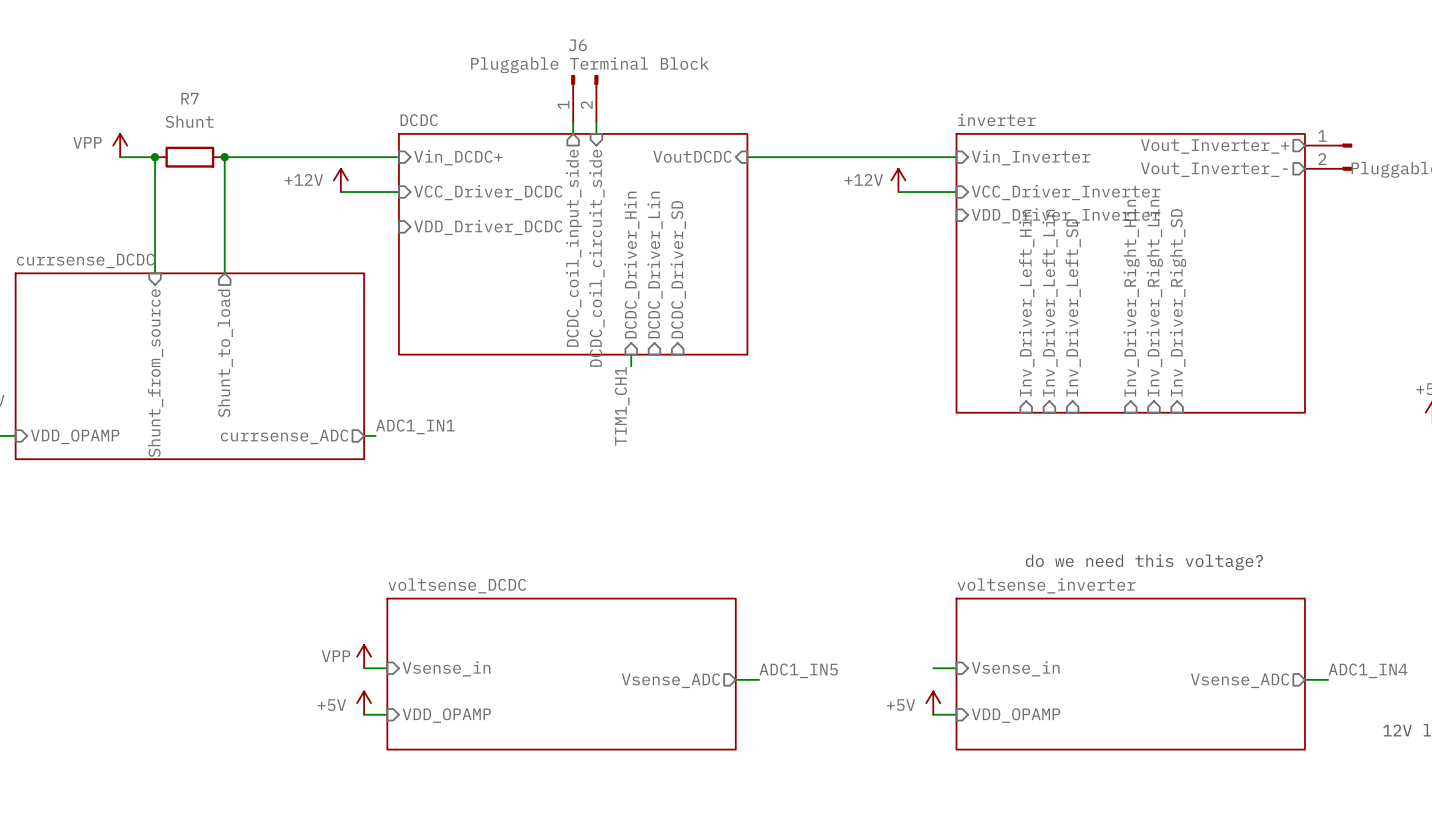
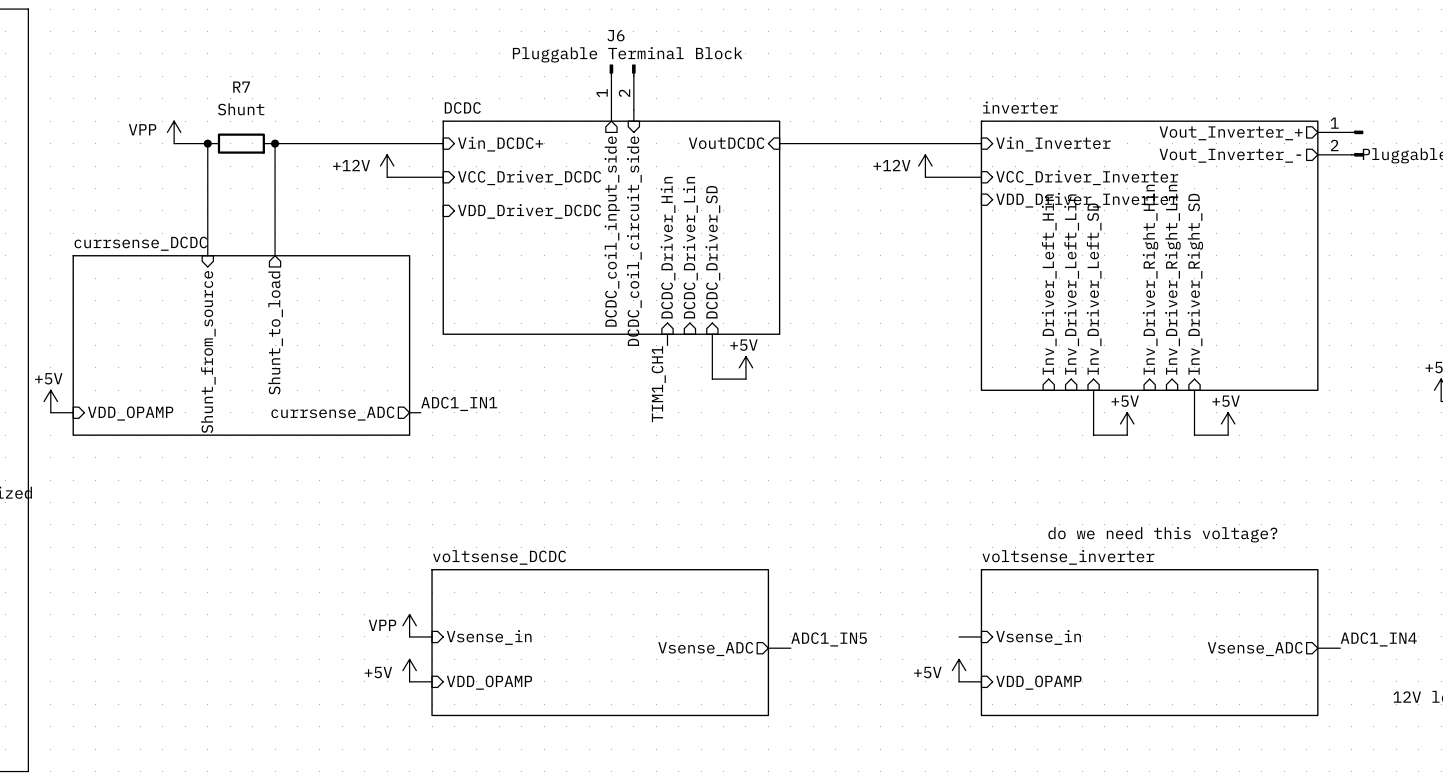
wire: none -> (712, 334) (712, 379) (745, 379)
power symbol: none -> +5V (745, 367)
wire: none -> (1093, 390) (1093, 435) (1127, 435)
wire: none -> (1194, 390) (1194, 435) (1228, 435)
power symbol: none -> +5V (1127, 423)
power symbol: none -> +5V (1228, 423)

